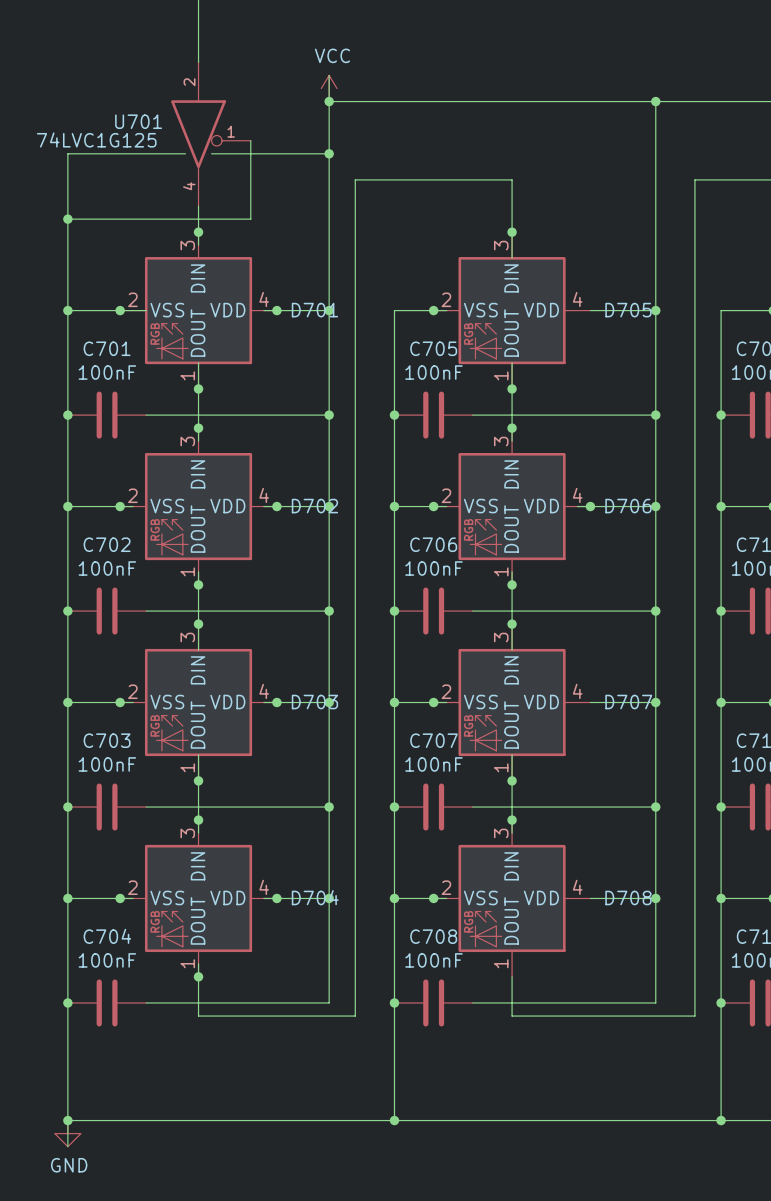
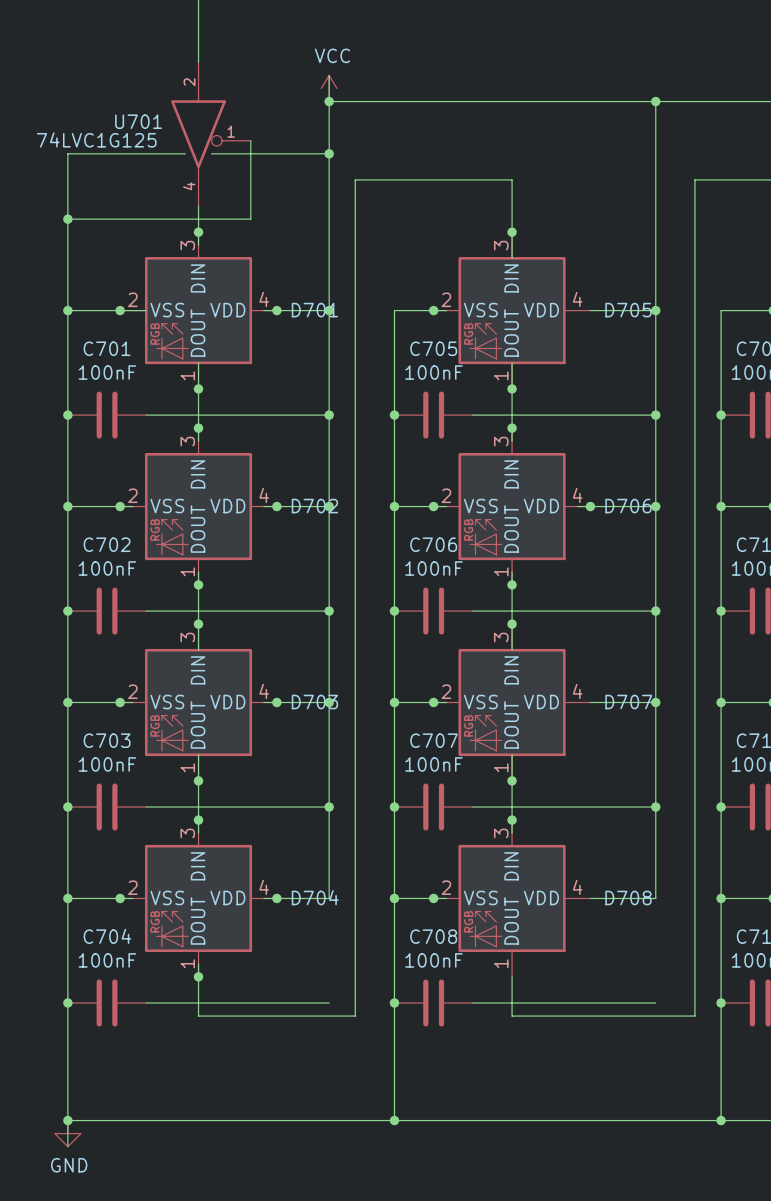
wire: (329, 898) (329, 1002) -> none
junction: (329, 898) -> none
wire: (655, 898) (655, 1002) -> none
junction: (655, 898) -> none

